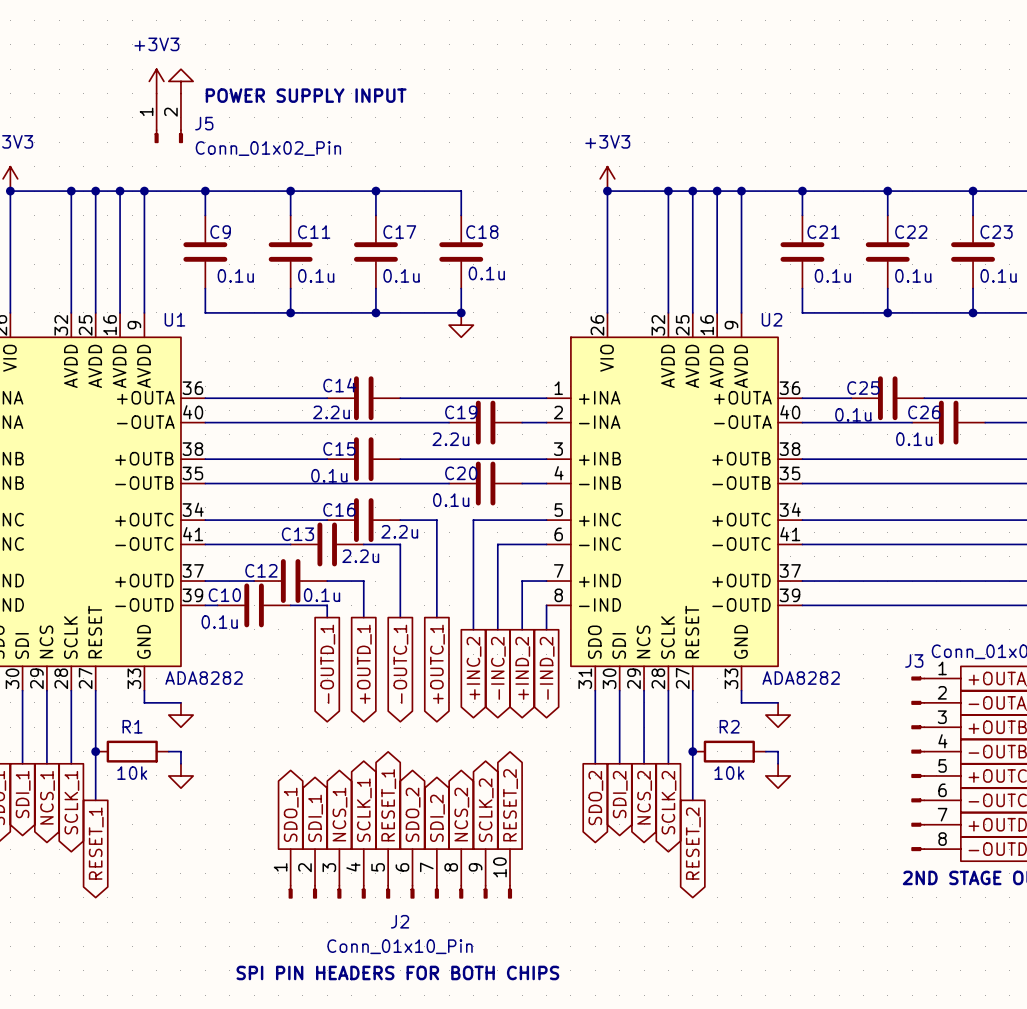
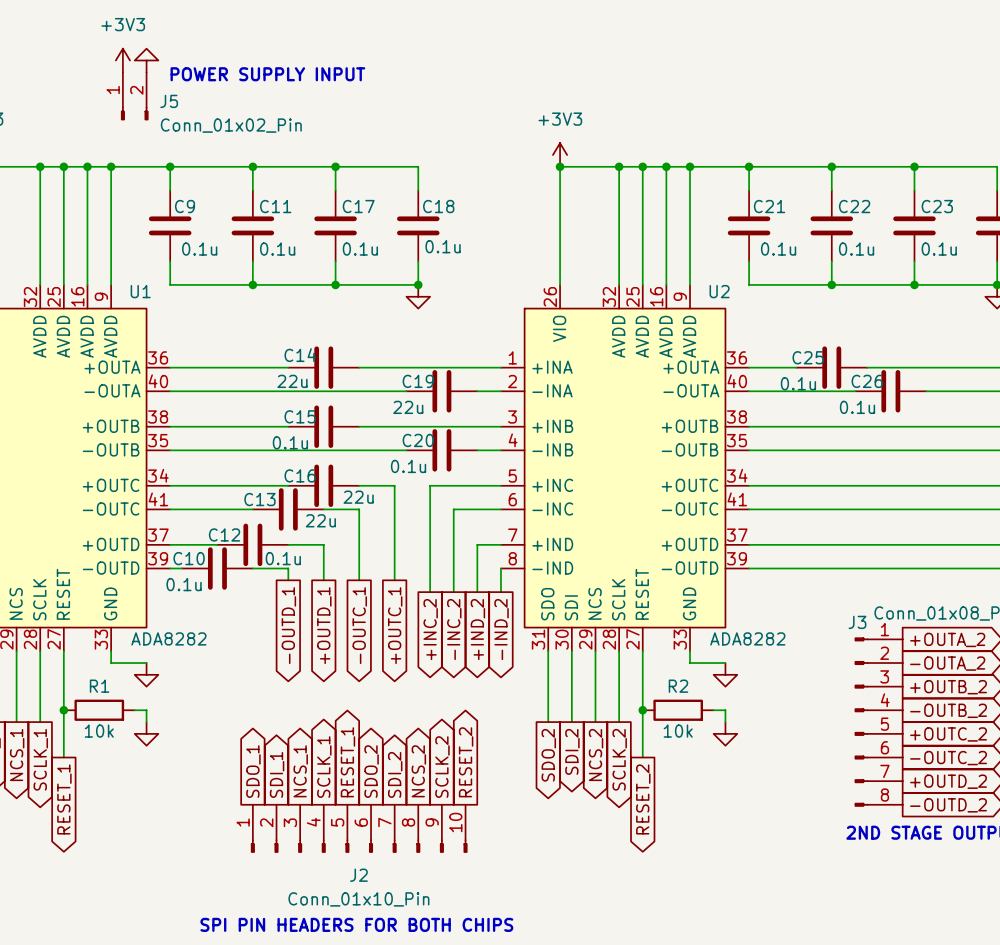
C14 value: 2.2u (331, 412) -> 22u (292, 381)
C19 value: 2.2u (450, 439) -> 22u (408, 407)
C16 value: 2.2u (399, 531) -> 22u (358, 497)
C13 value: 2.2u (360, 556) -> 22u (320, 520)

